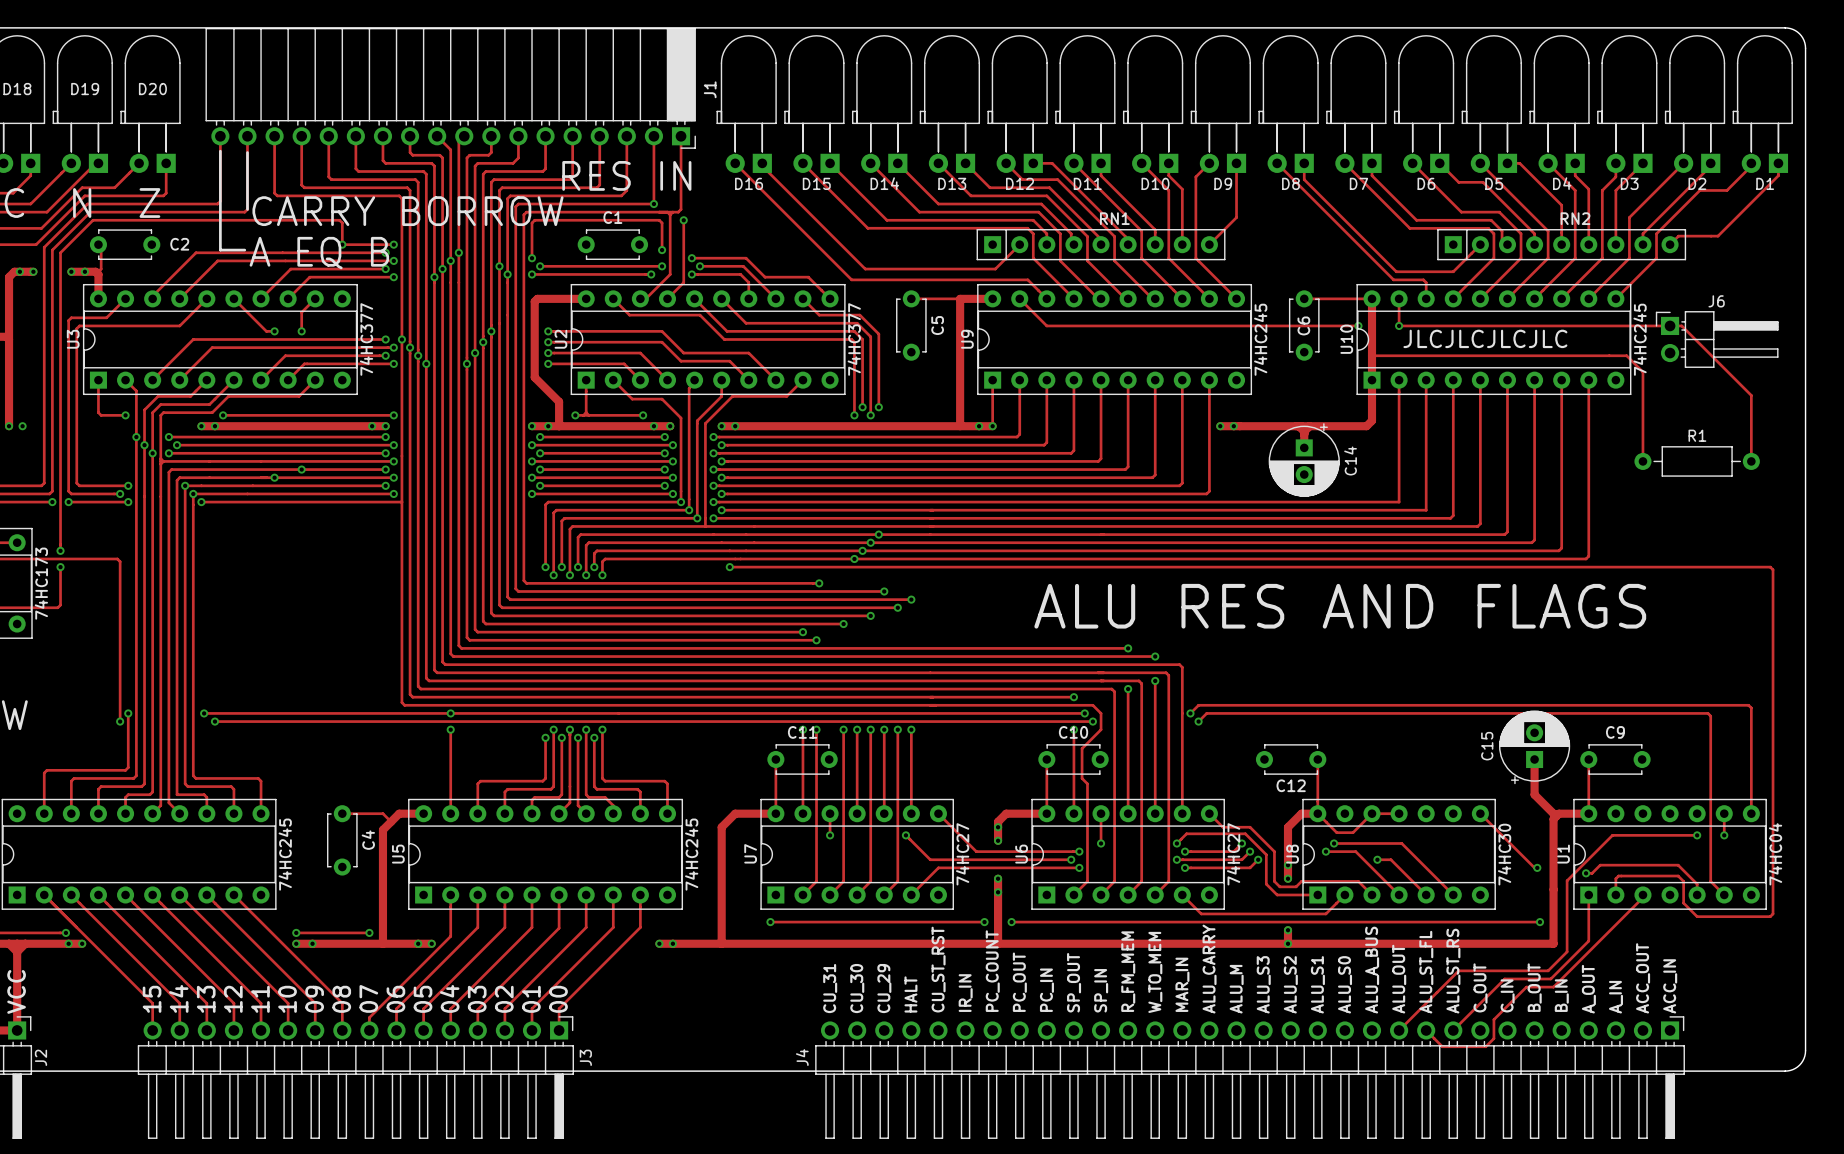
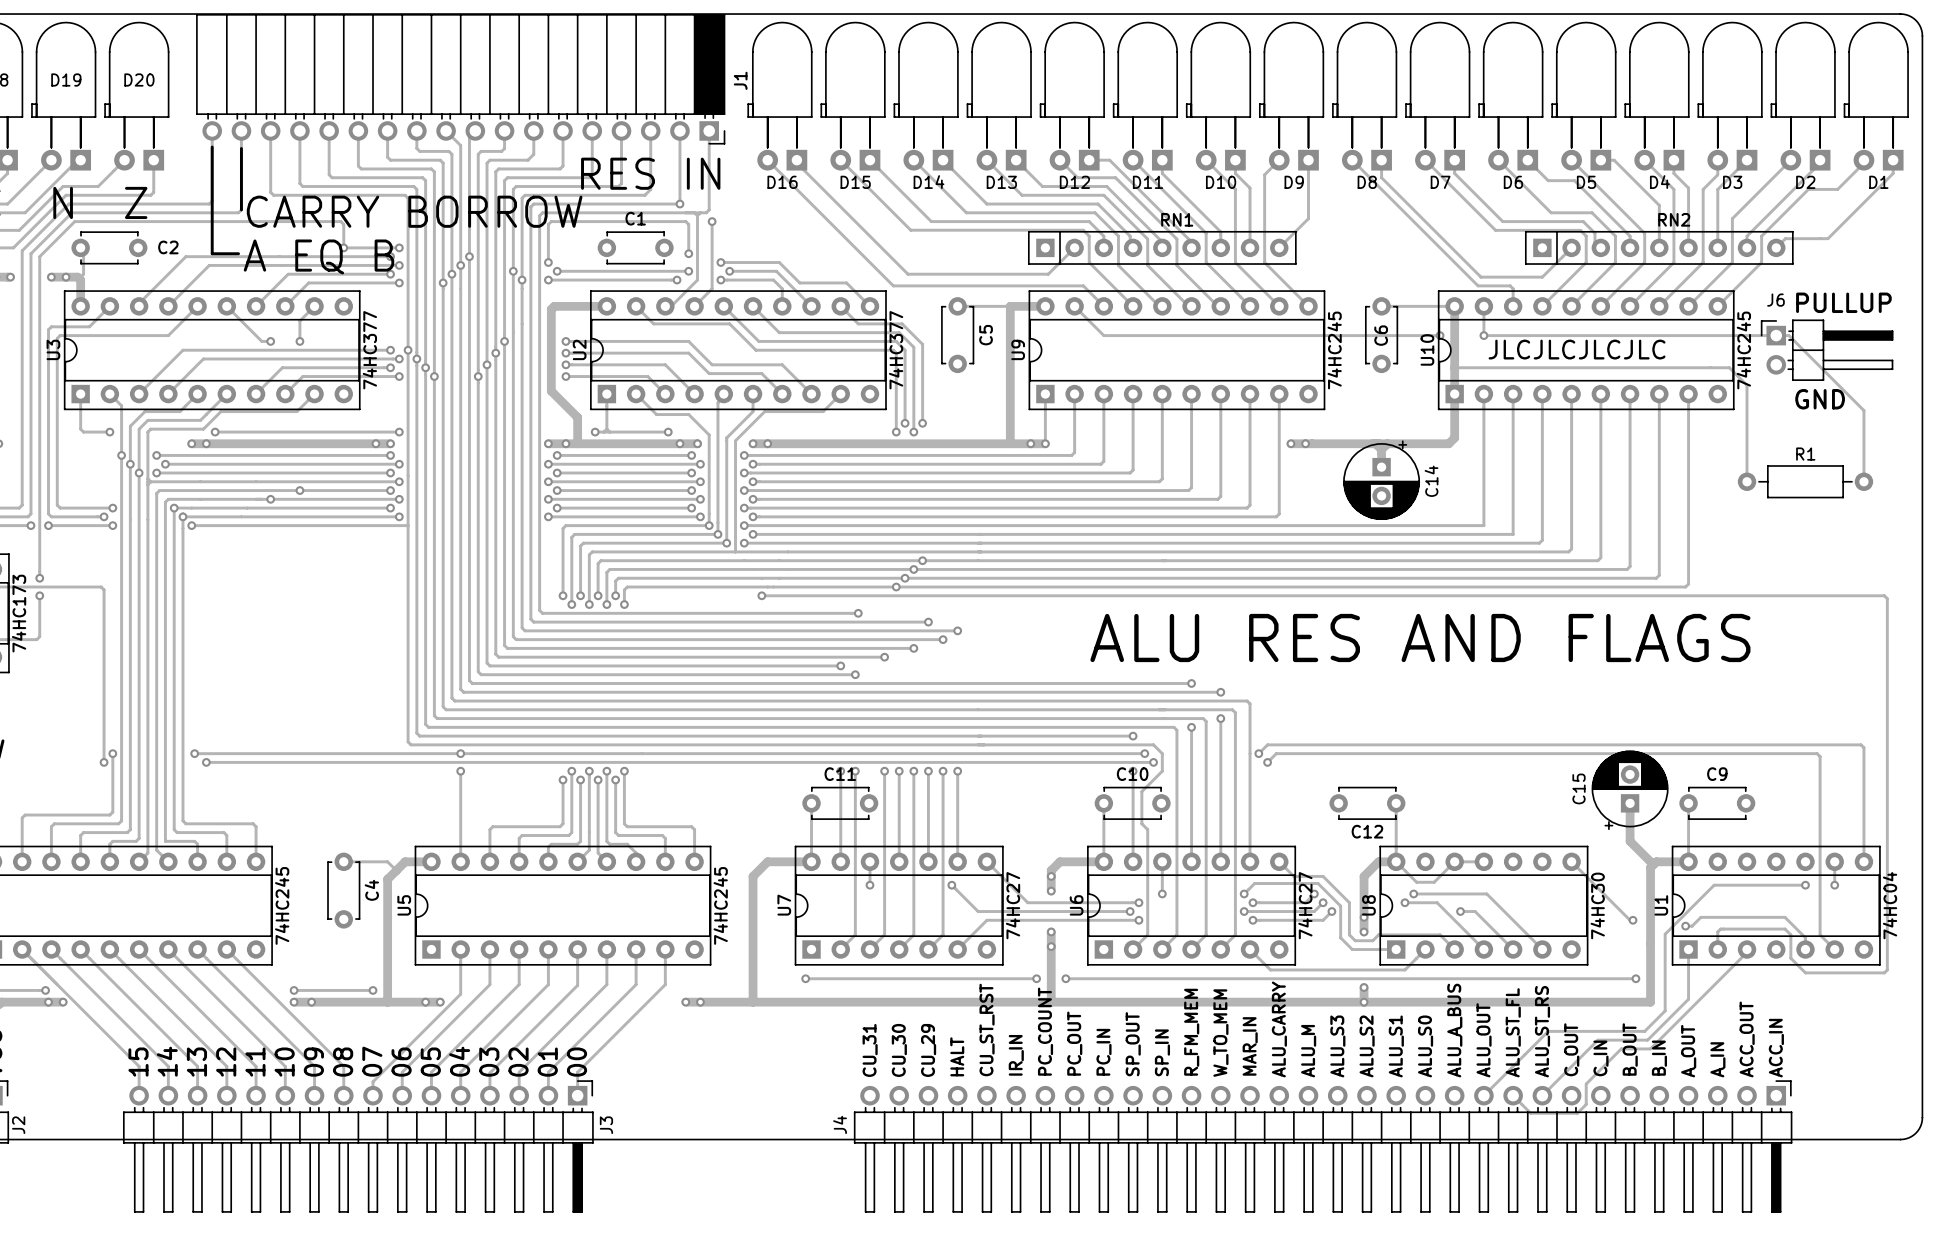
text: none -> PULLUP (1843, 302)
J6 name position: J6 (1716, 301) -> J6 (1775, 300)
text: none -> GND (1820, 399)

